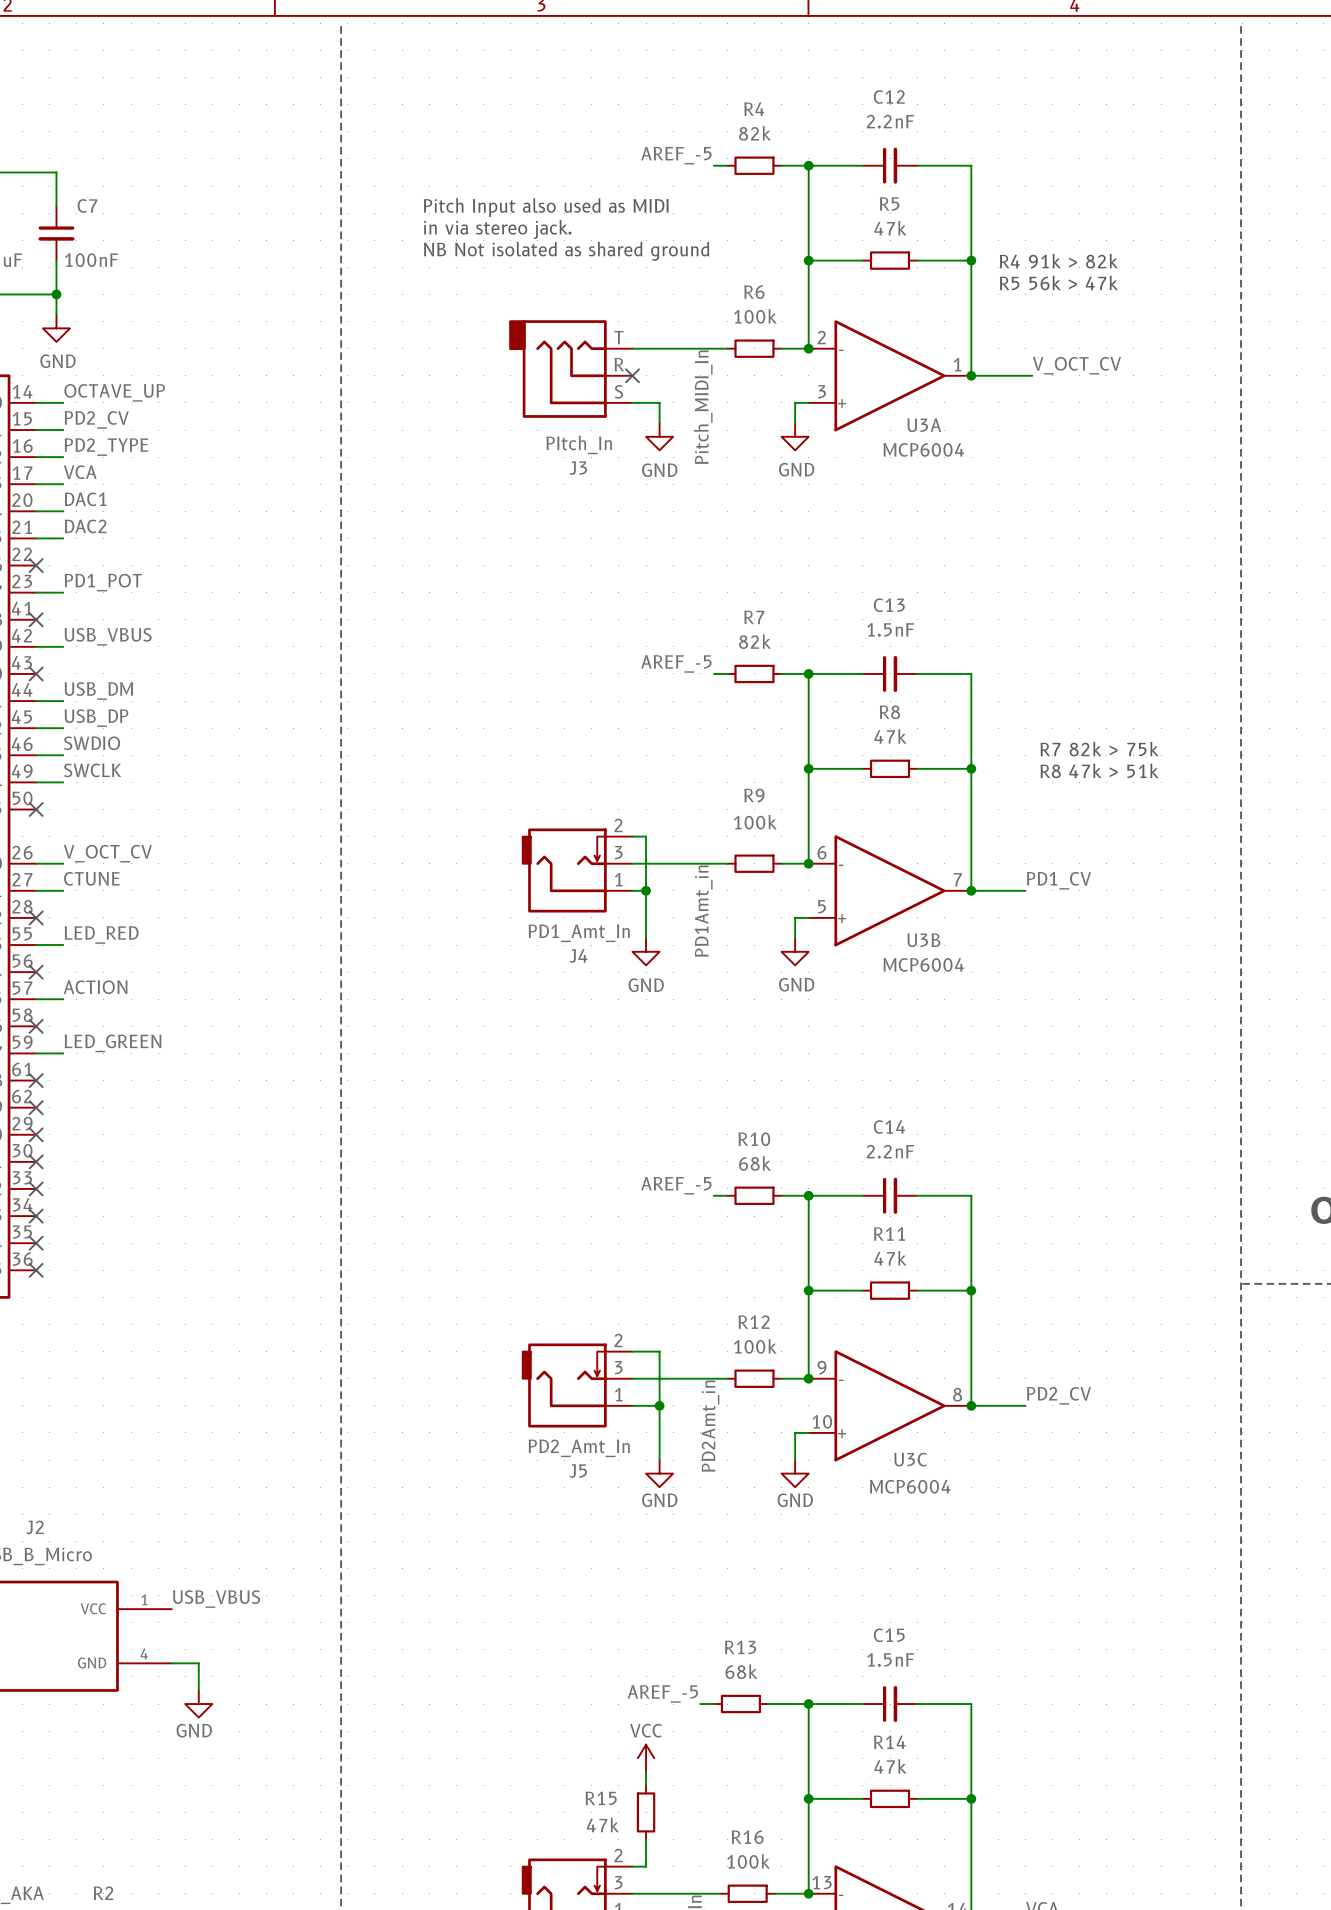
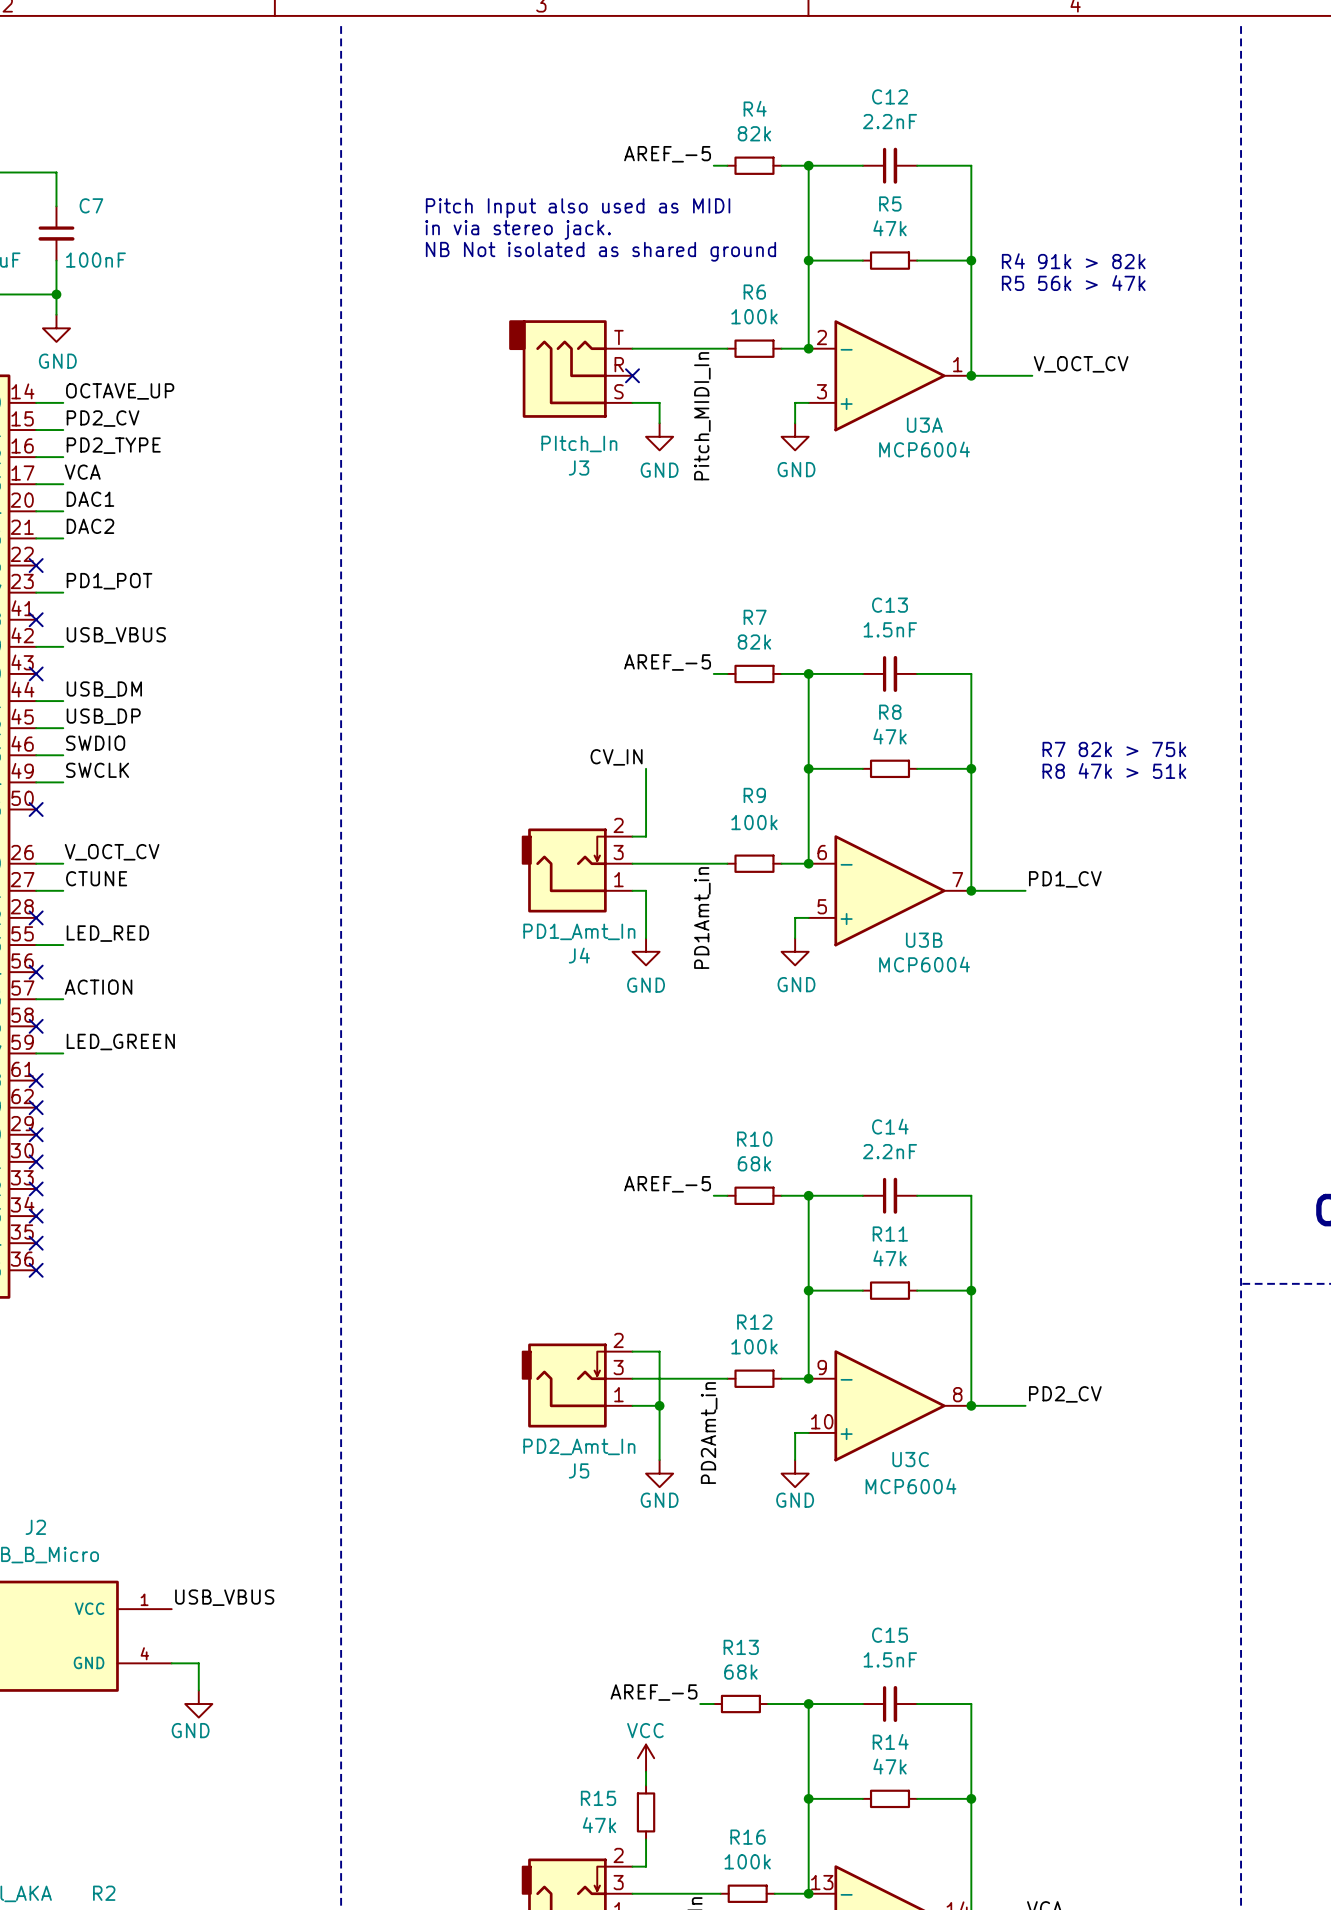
label: none -> CV_IN (616, 757)
wire: (646, 836) (646, 890) -> (646, 836) (646, 768)
junction: (646, 890) -> none

